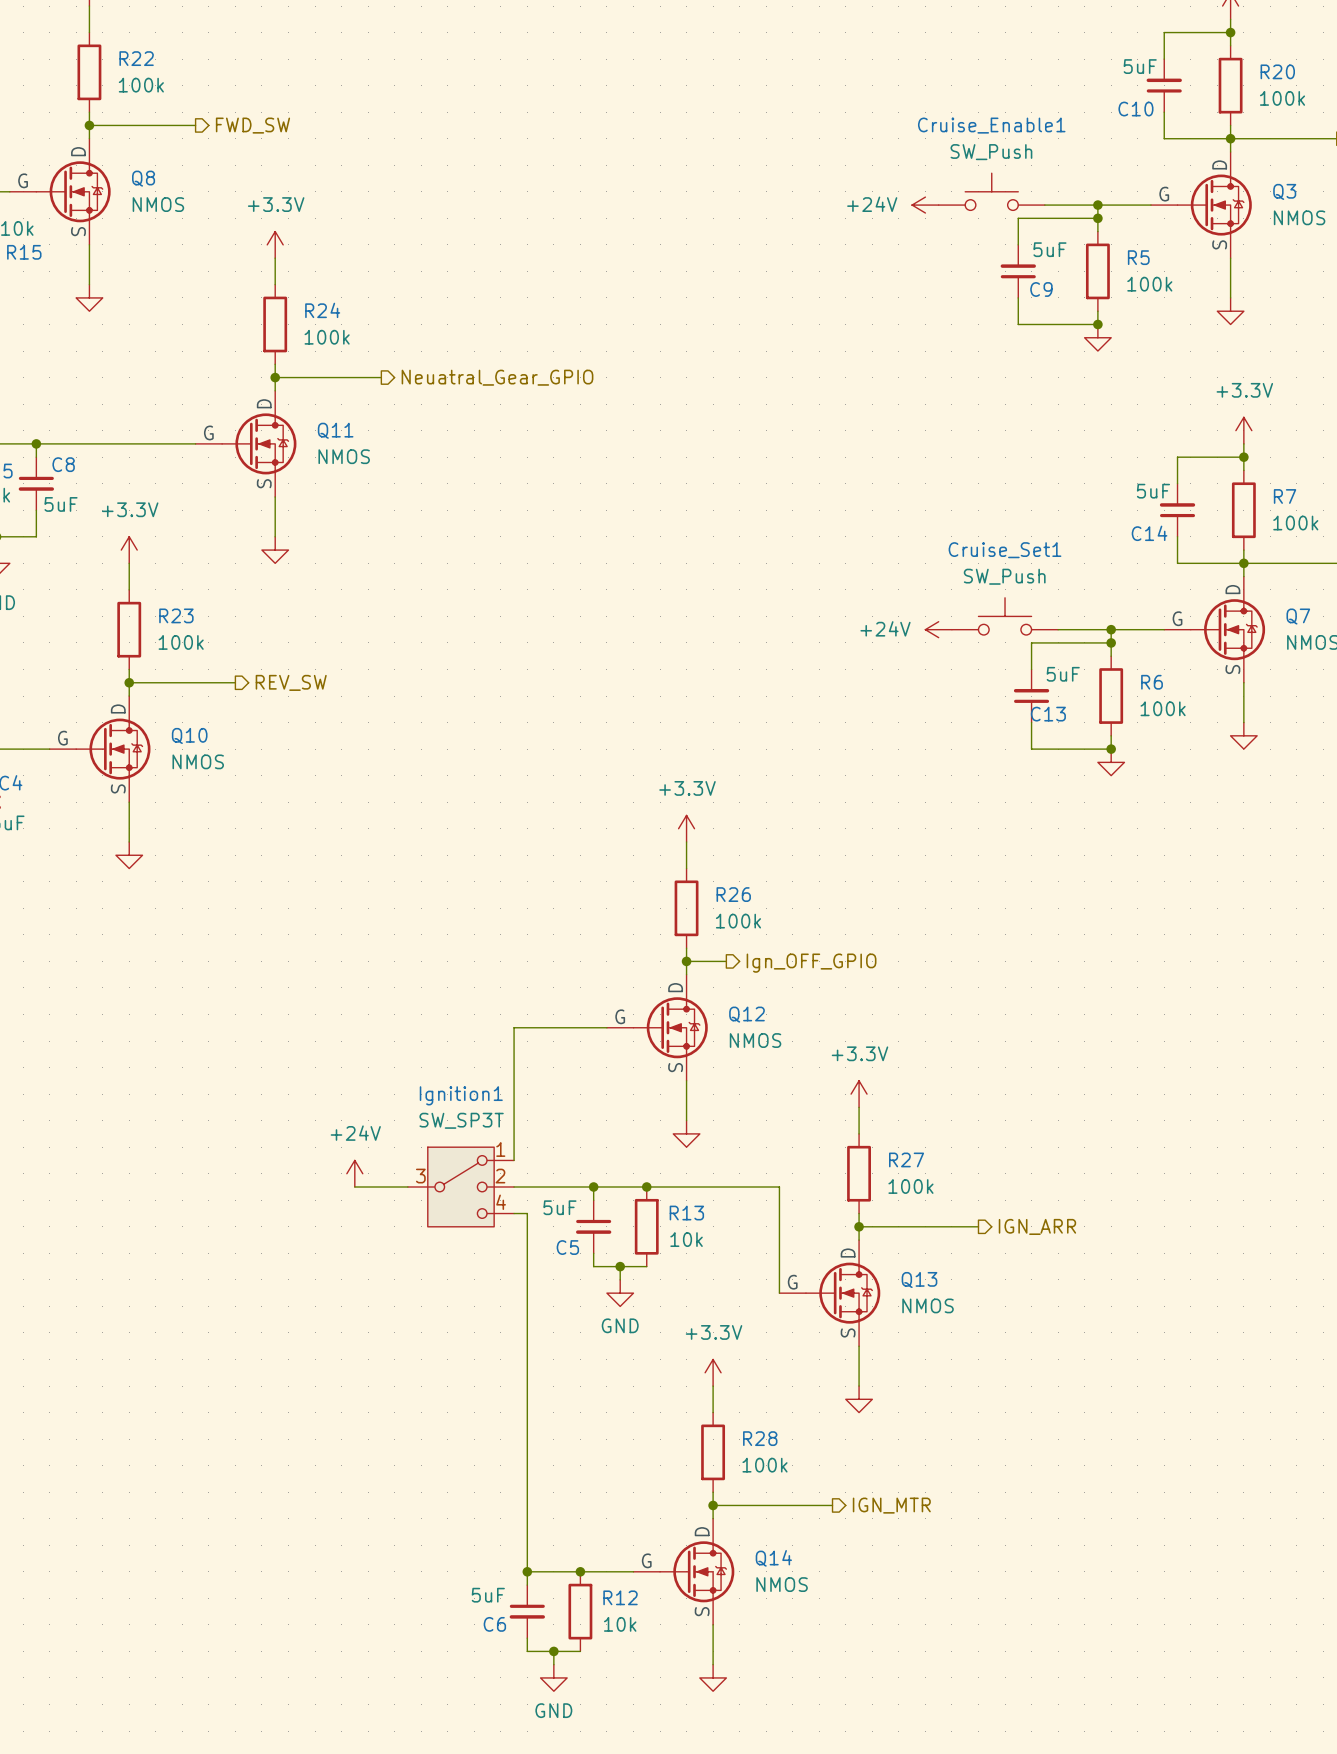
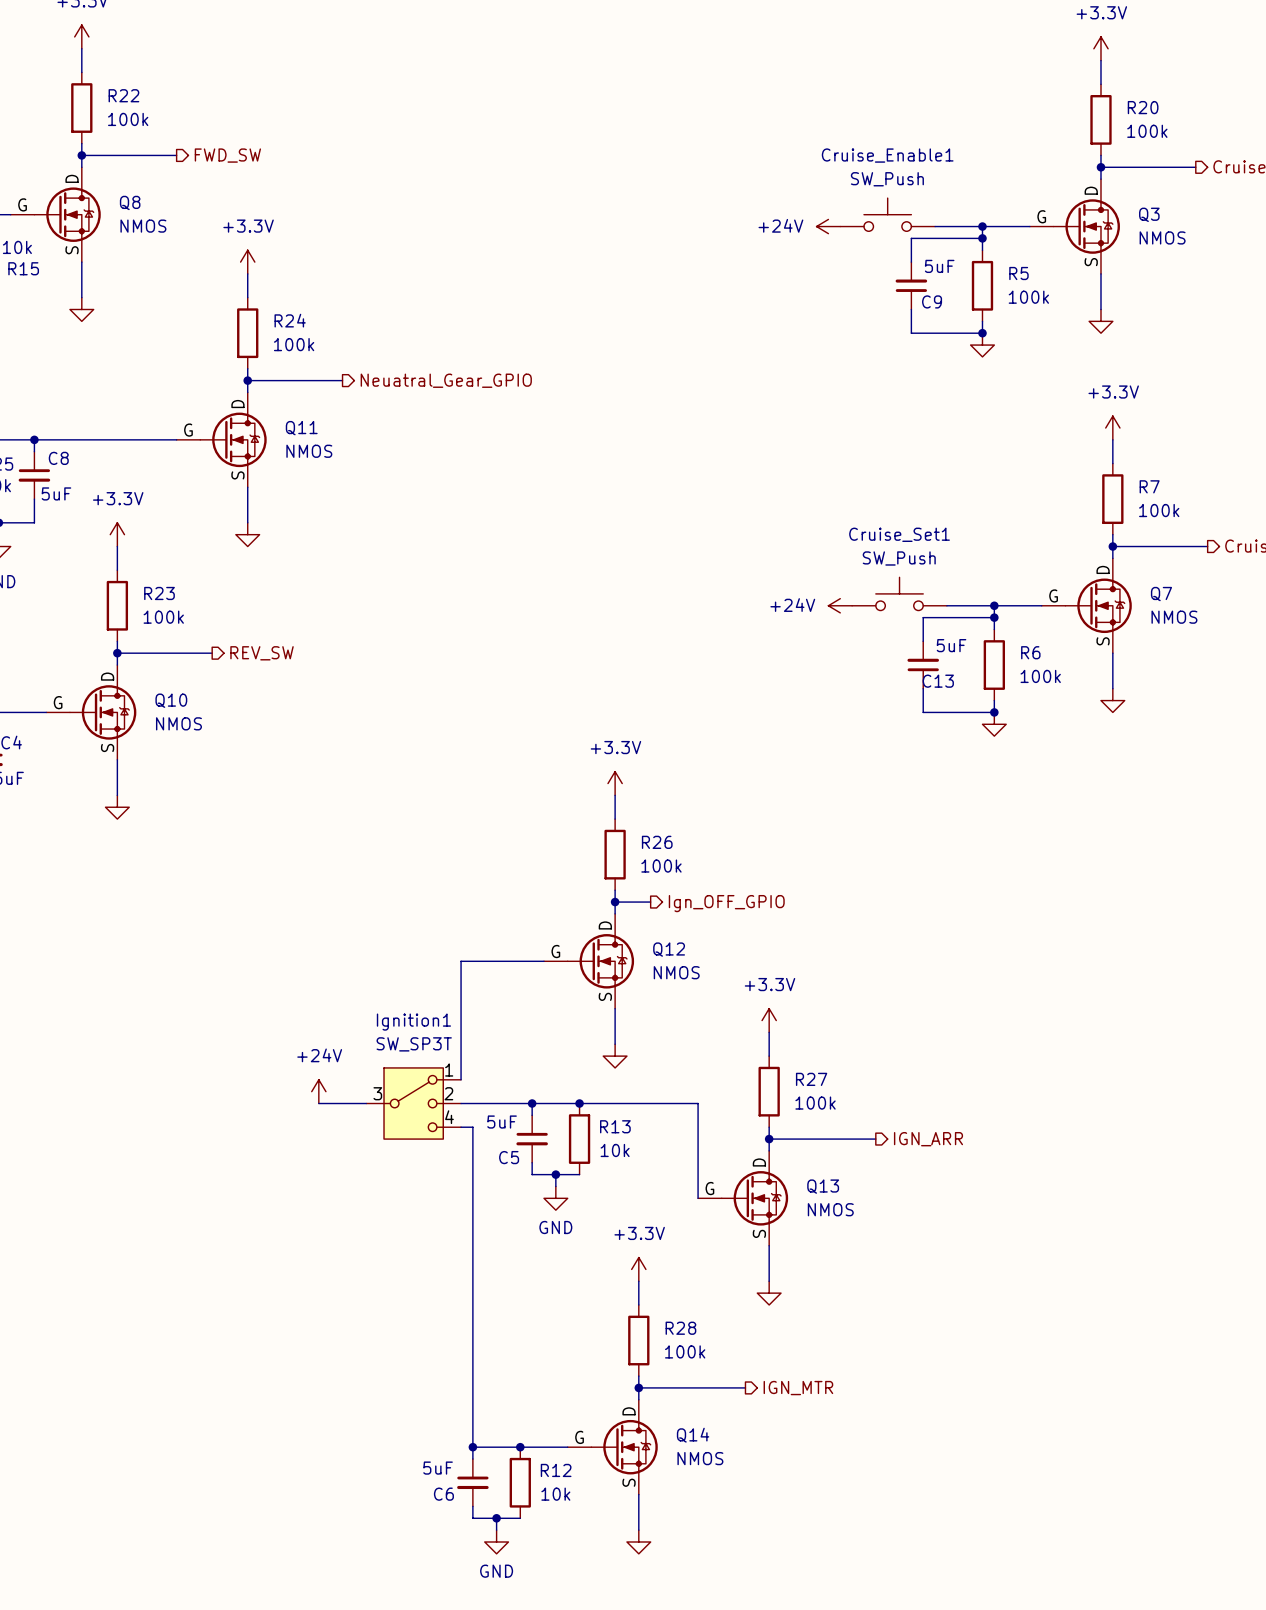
wire: (1230, 32) (1164, 32) (1164, 59) -> none
junction: (1230, 32) -> none
C10: 5uF (1164, 85) -> none
wire: (1164, 112) (1164, 138) (1230, 138) -> none
wire: (1243, 457) (1177, 457) (1177, 483) -> none
junction: (1243, 457) -> none
C14: 5uF (1177, 510) -> none
wire: (1177, 536) (1177, 563) (1243, 563) -> none

